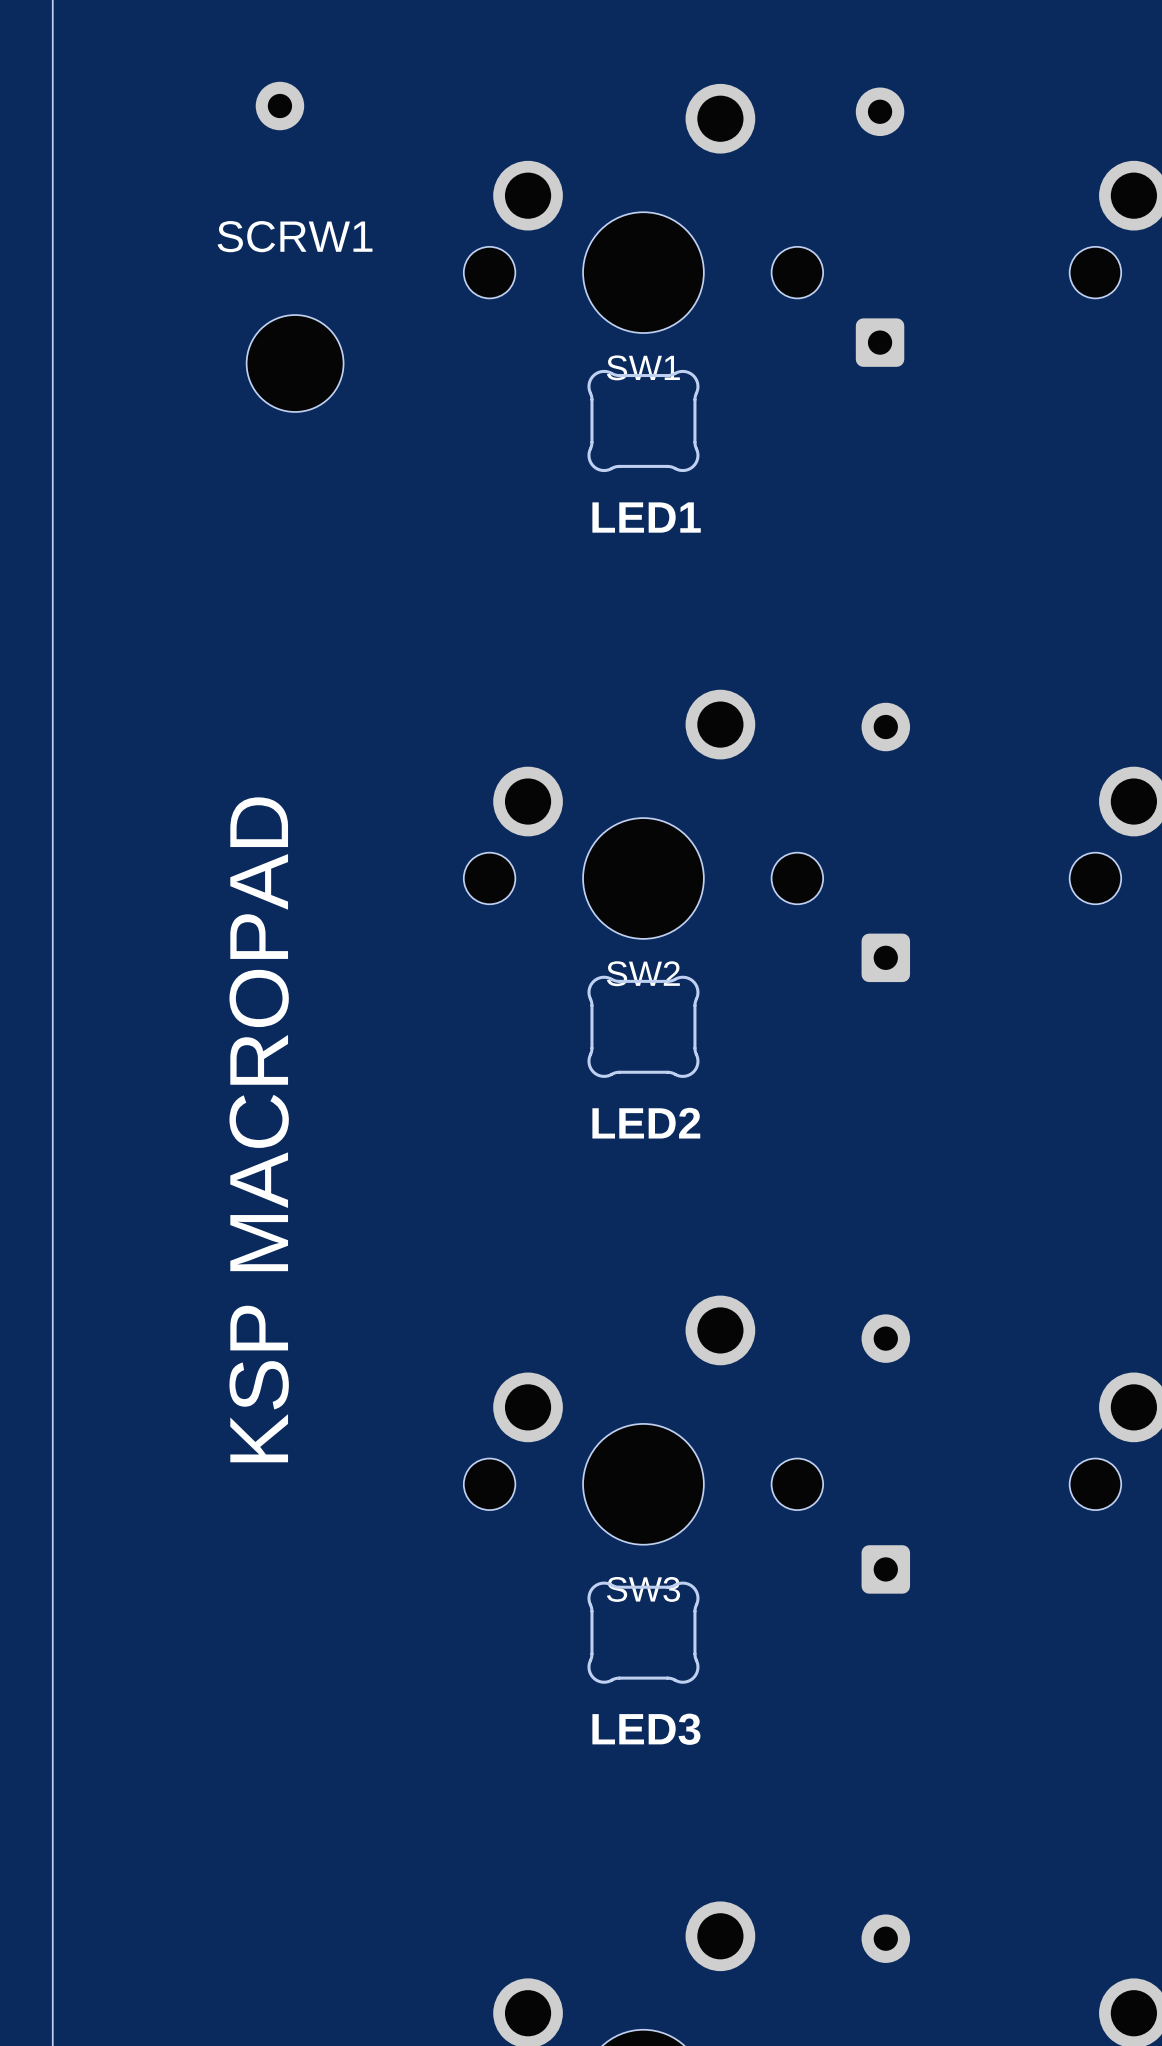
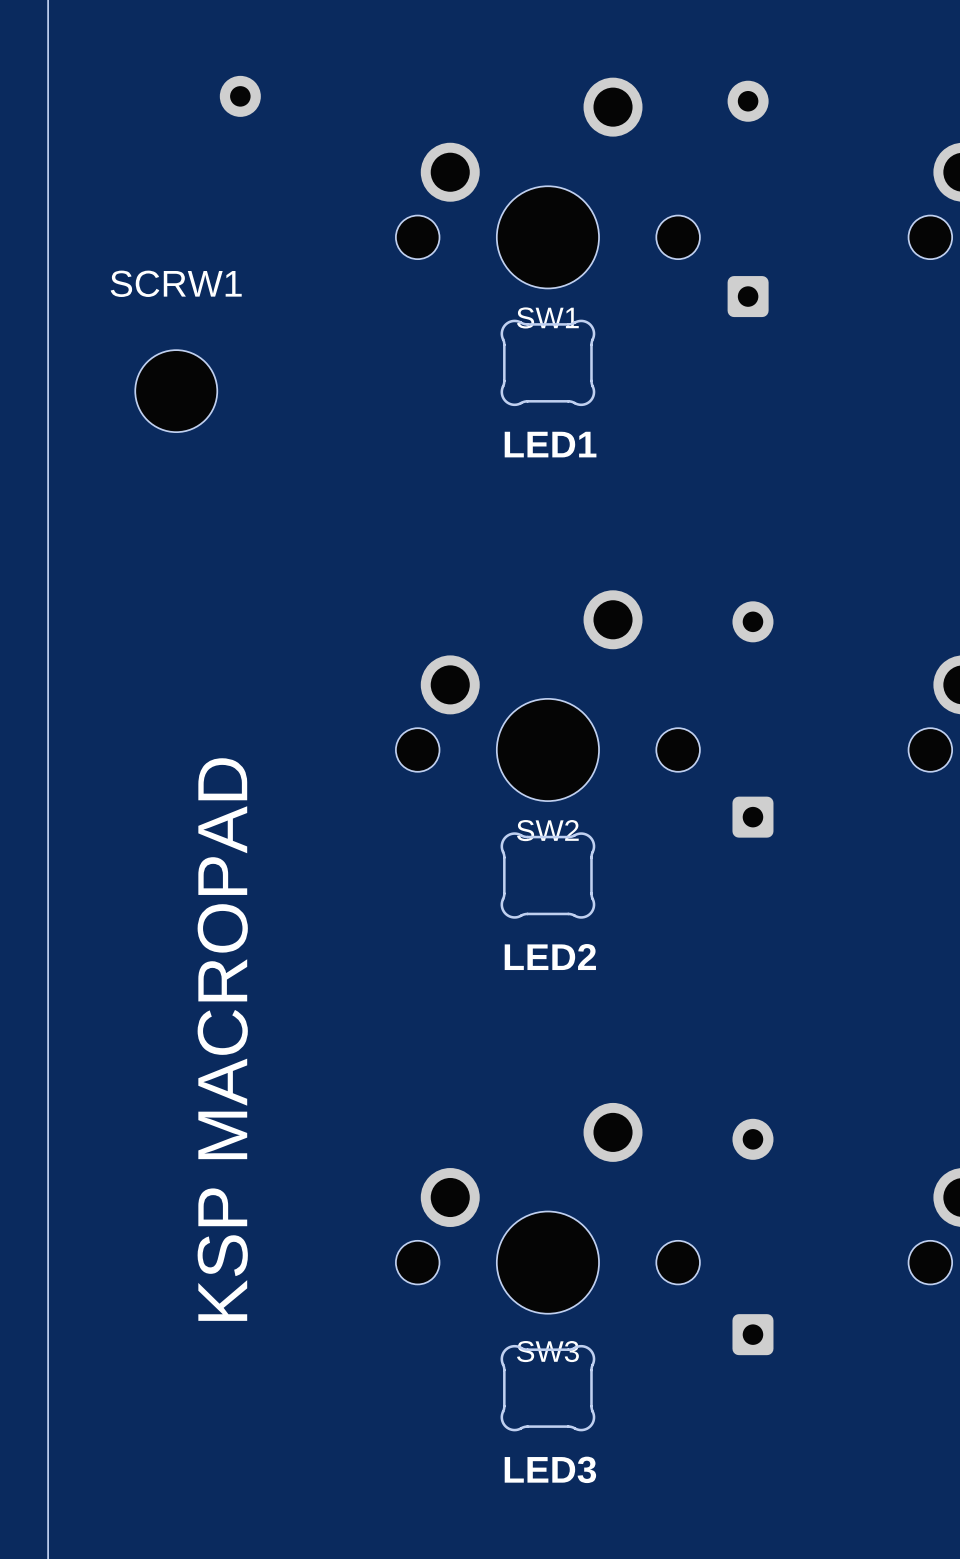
SCRW1 position: (295, 363) -> (176, 391)
text position: KSP MACROPAD (259, 1129) -> KSP MACROPAD (222, 1039)

